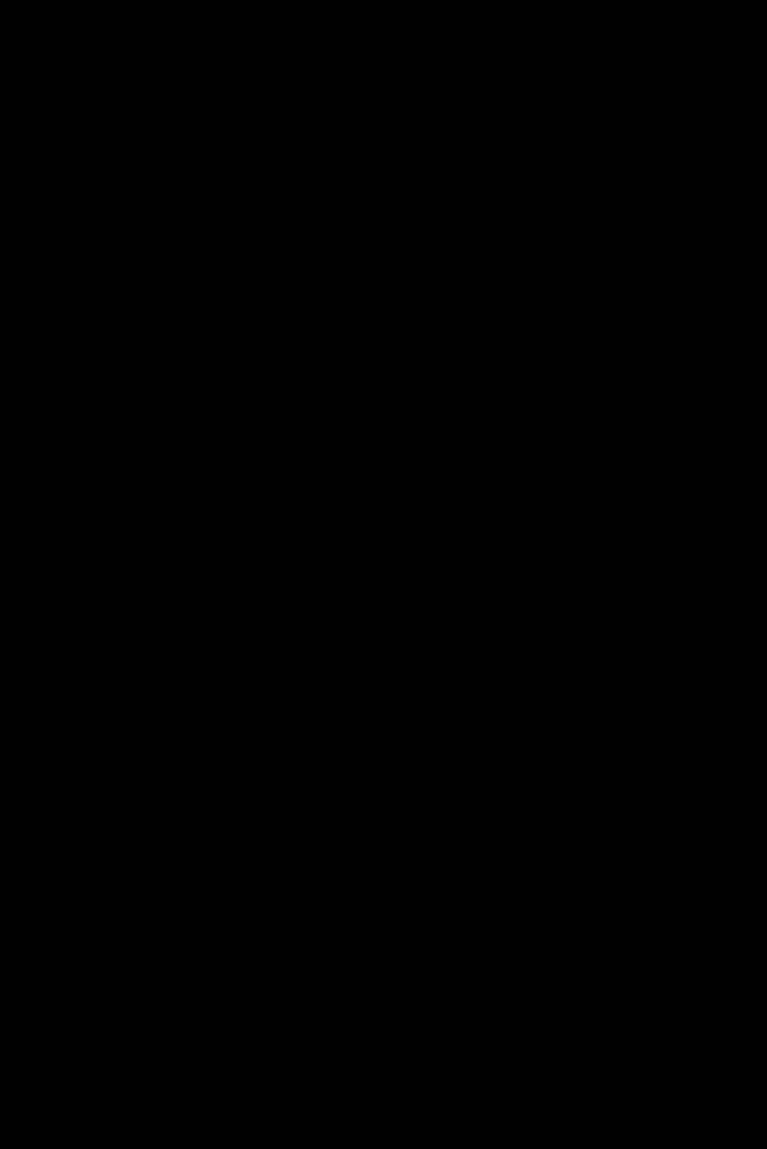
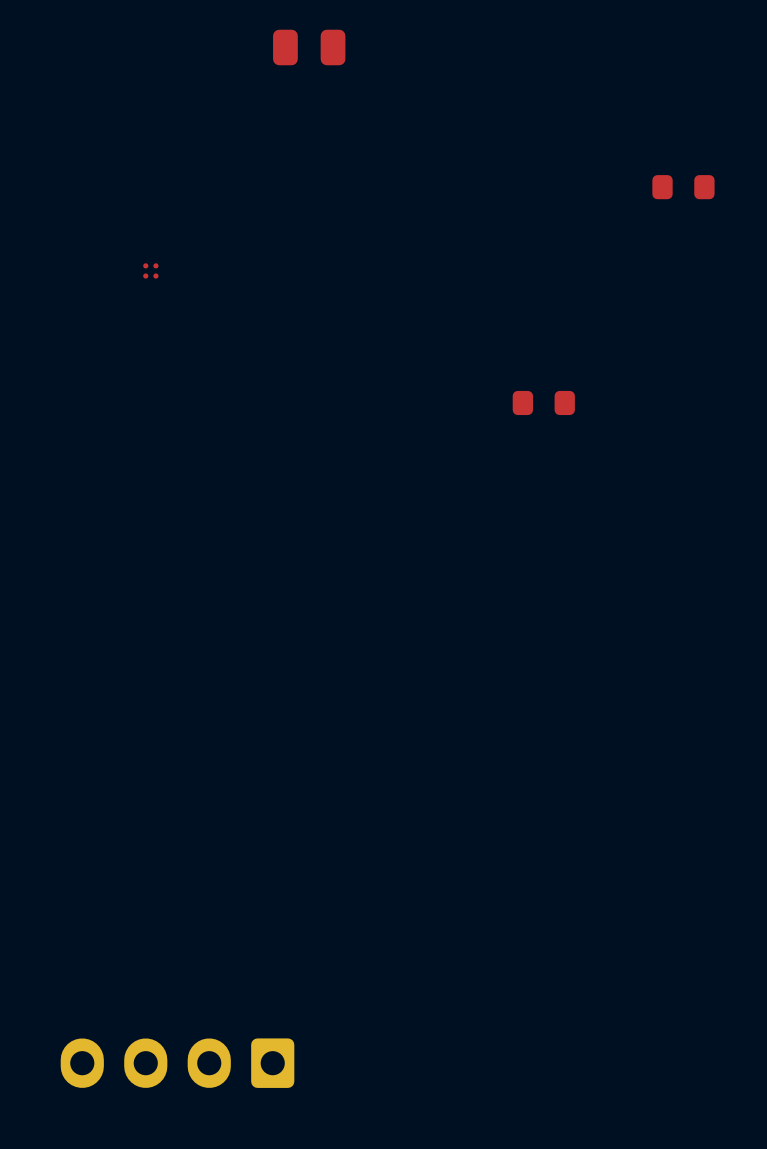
part: none -> (309, 47)
part: none -> (683, 187)
part: none -> (150, 270)
part: none -> (543, 402)
part: none -> (177, 1063)

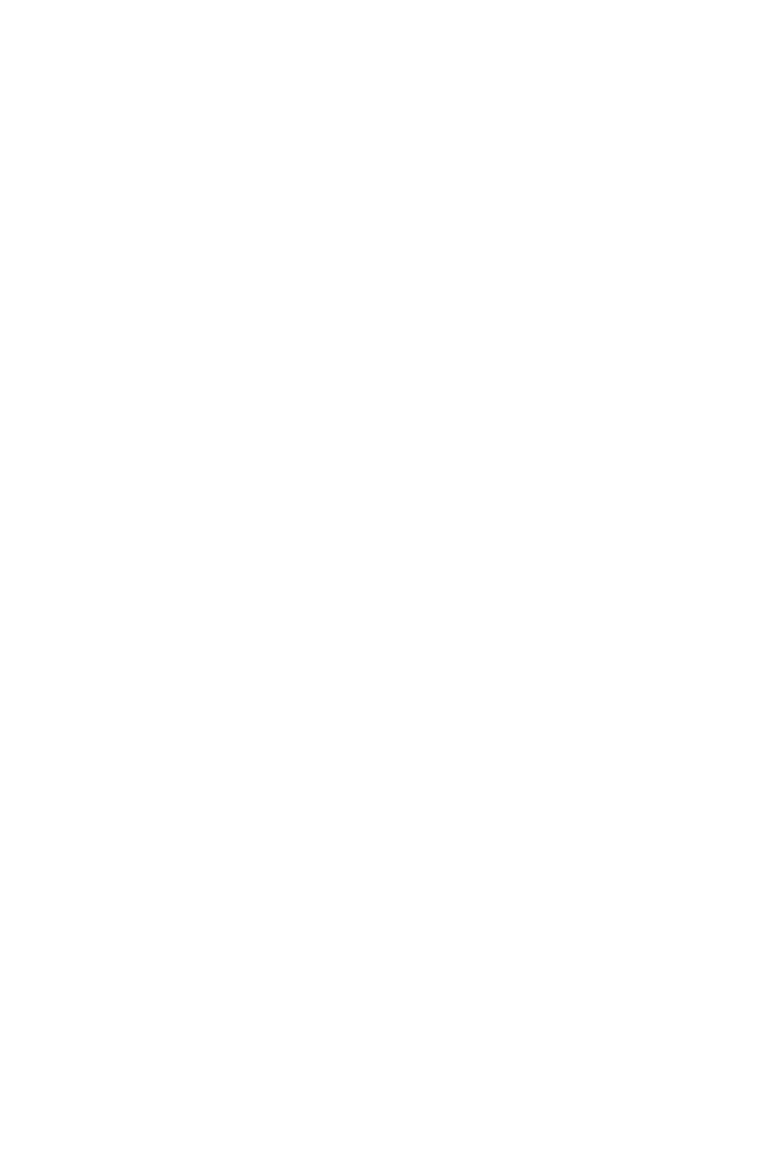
part: (309, 47) -> none
part: (683, 187) -> none
part: (150, 270) -> none
part: (543, 402) -> none
part: (177, 1063) -> none

